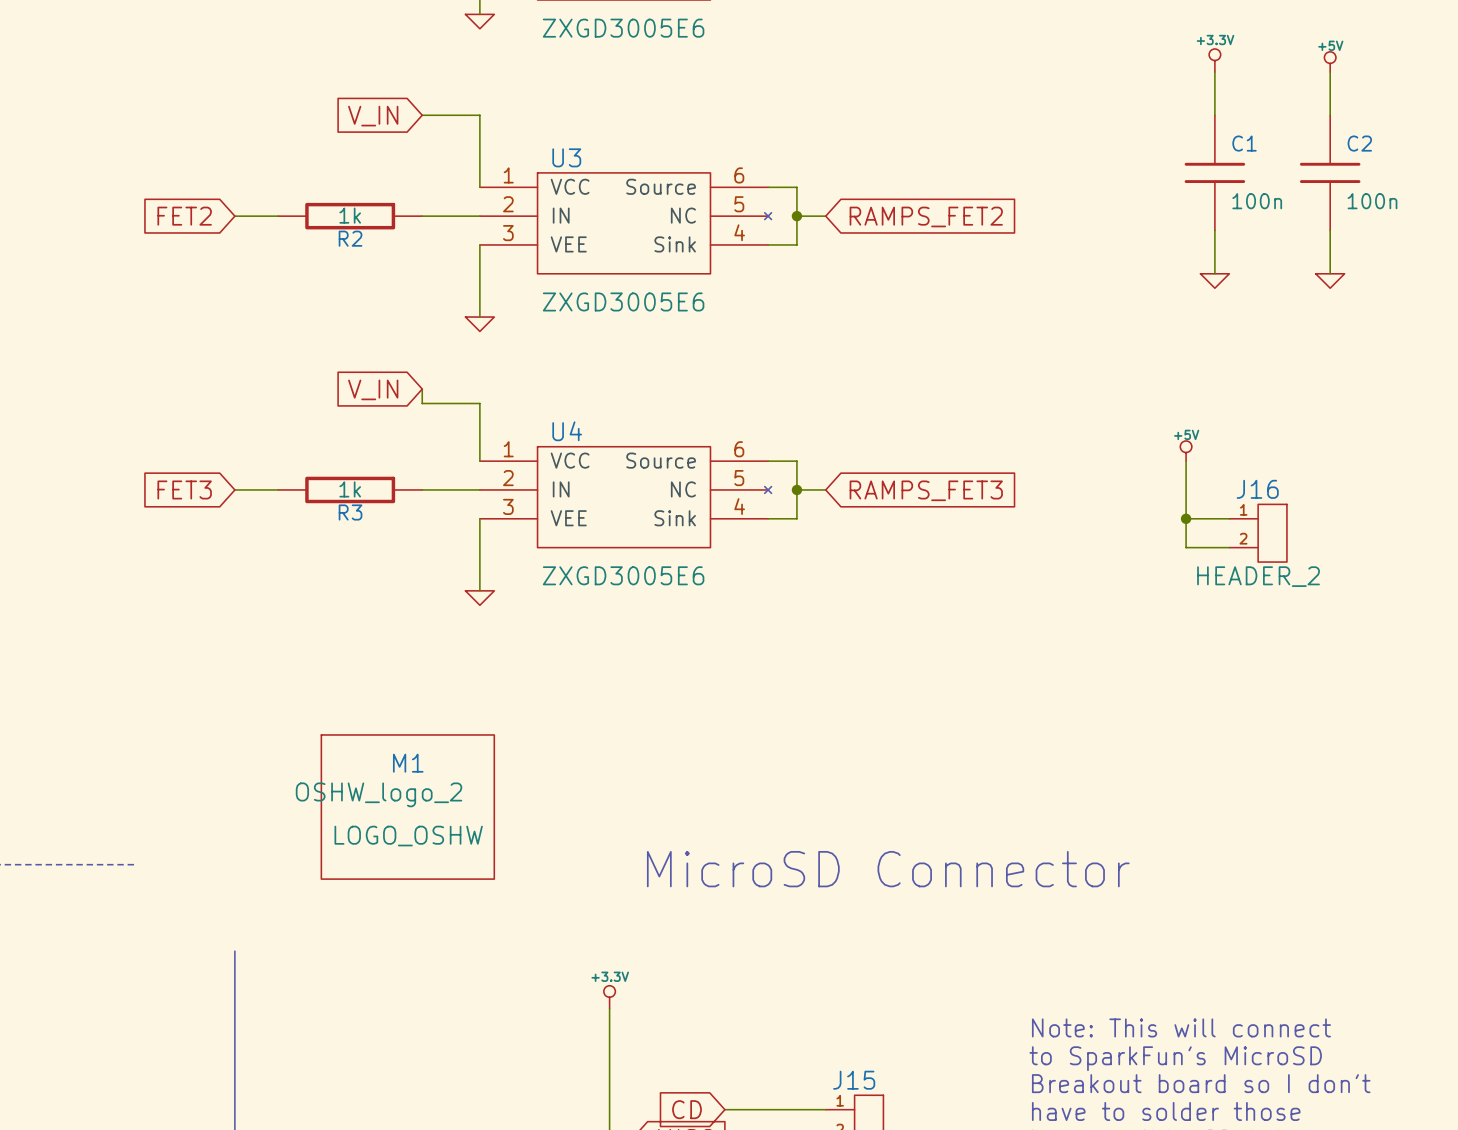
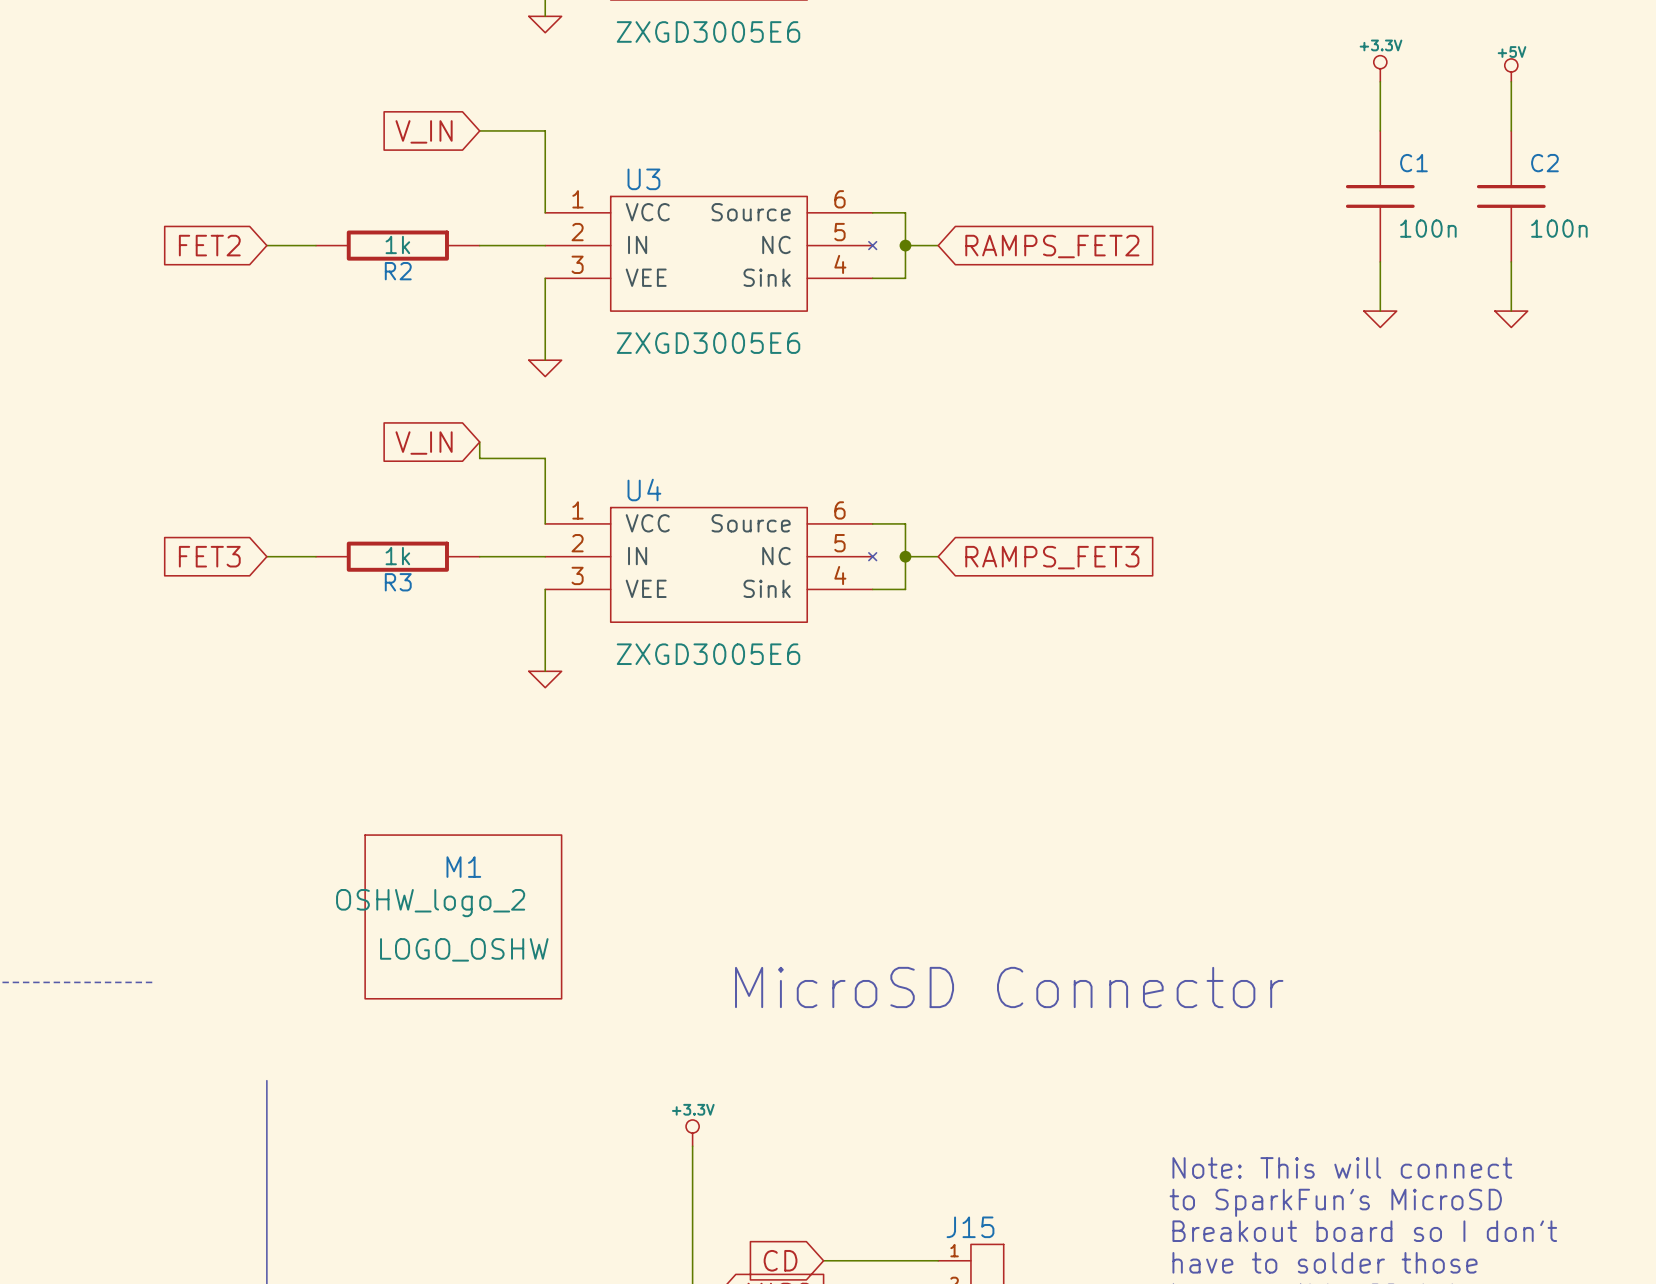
power symbol: +5V (1186, 451) -> none
wire: (1186, 461) (1186, 547) (1229, 547) -> none
wire: (1186, 518) (1229, 518) -> none
junction: (1186, 518) -> none
J16: HEADER_2 (1258, 533) -> none

